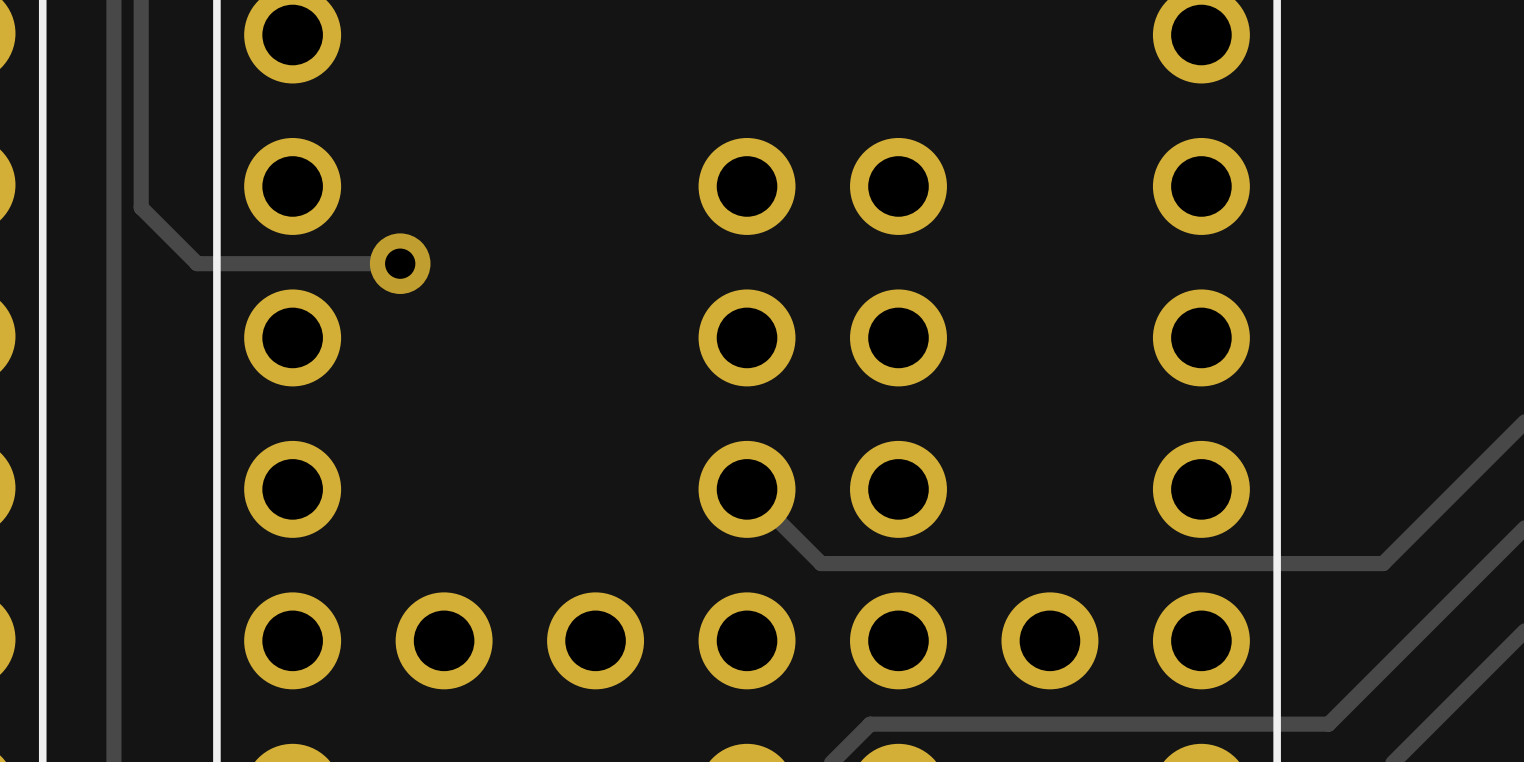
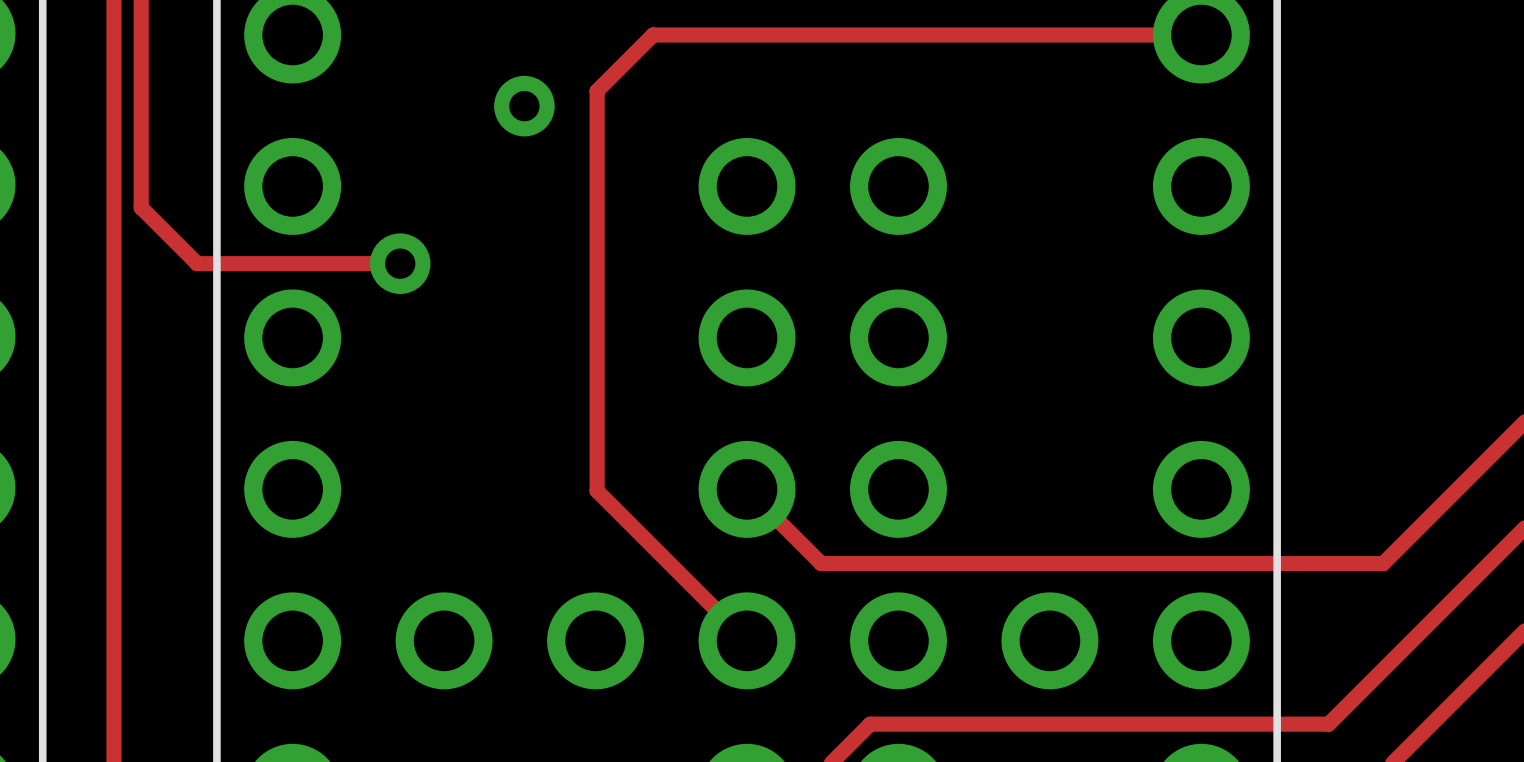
track: none -> (1201, 35) (653, 35) (597, 91) (597, 490) (747, 640)
via: none -> (524, 106)

